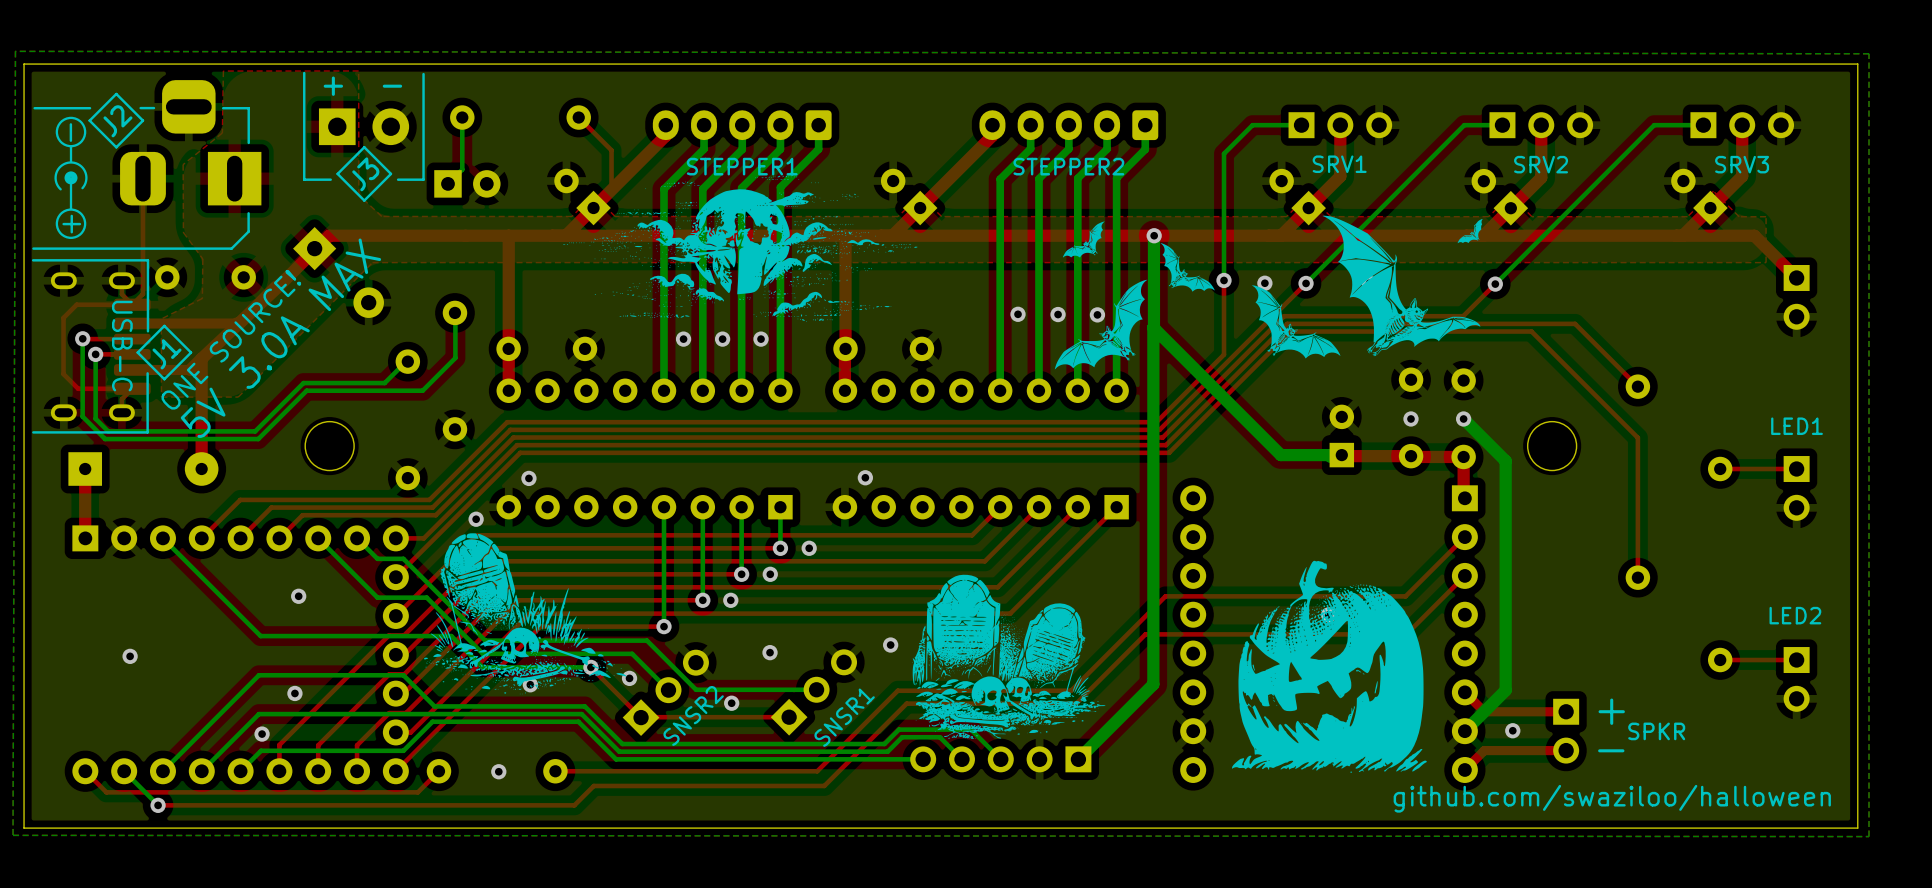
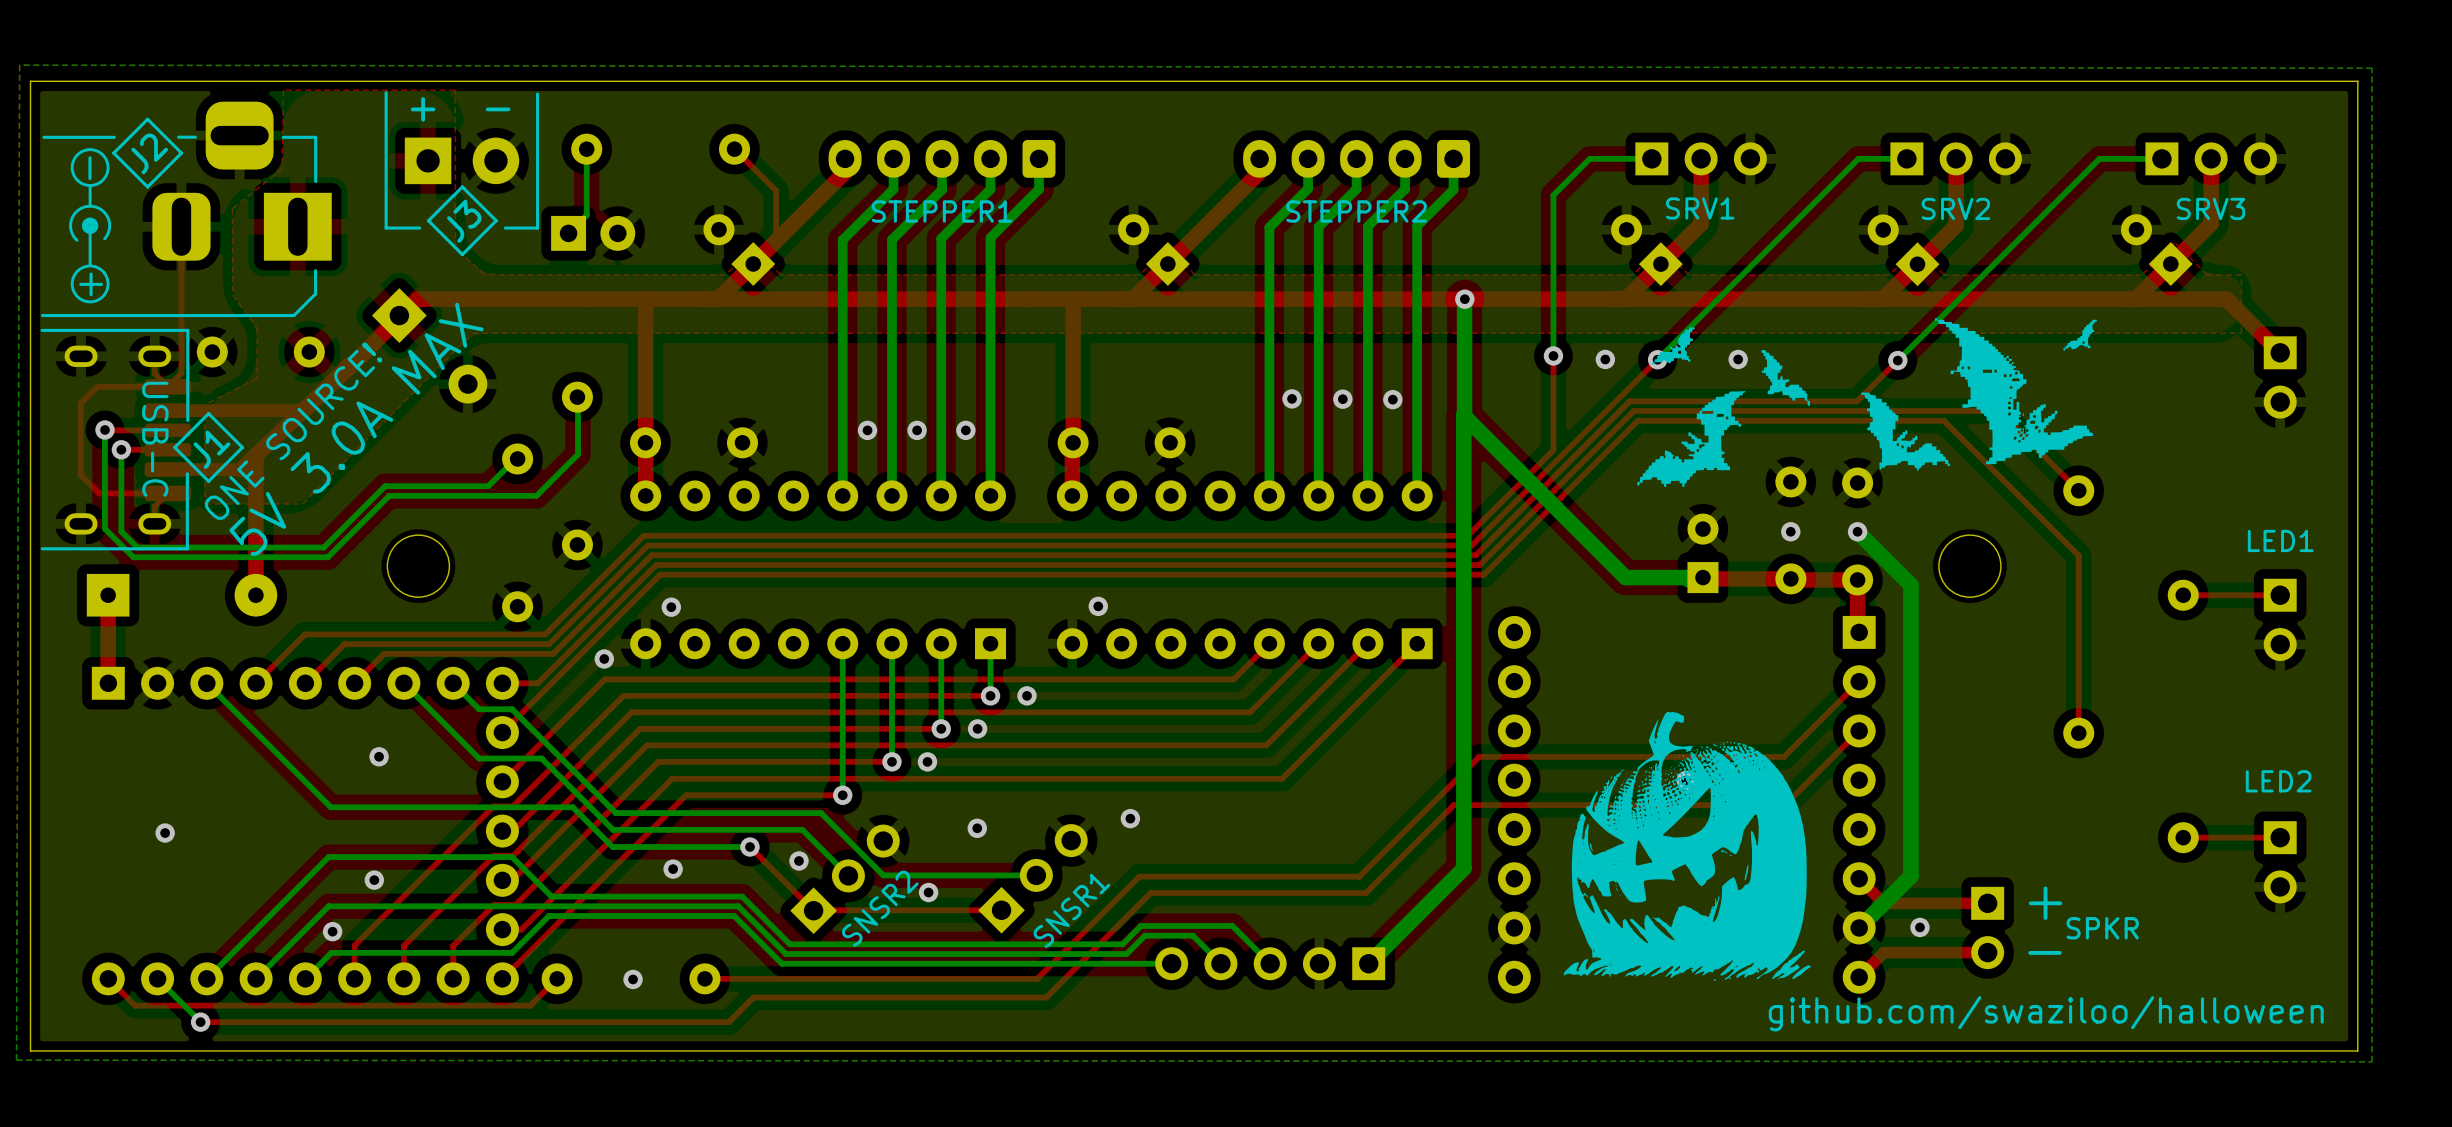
drawing: [562, 175, 918, 322] -> none
drawing: [1054, 215, 1483, 370] -> none
drawing: none -> [1637, 317, 2097, 488]
drawing: [423, 533, 627, 695] -> none
drawing: [912, 574, 1106, 739] -> none

